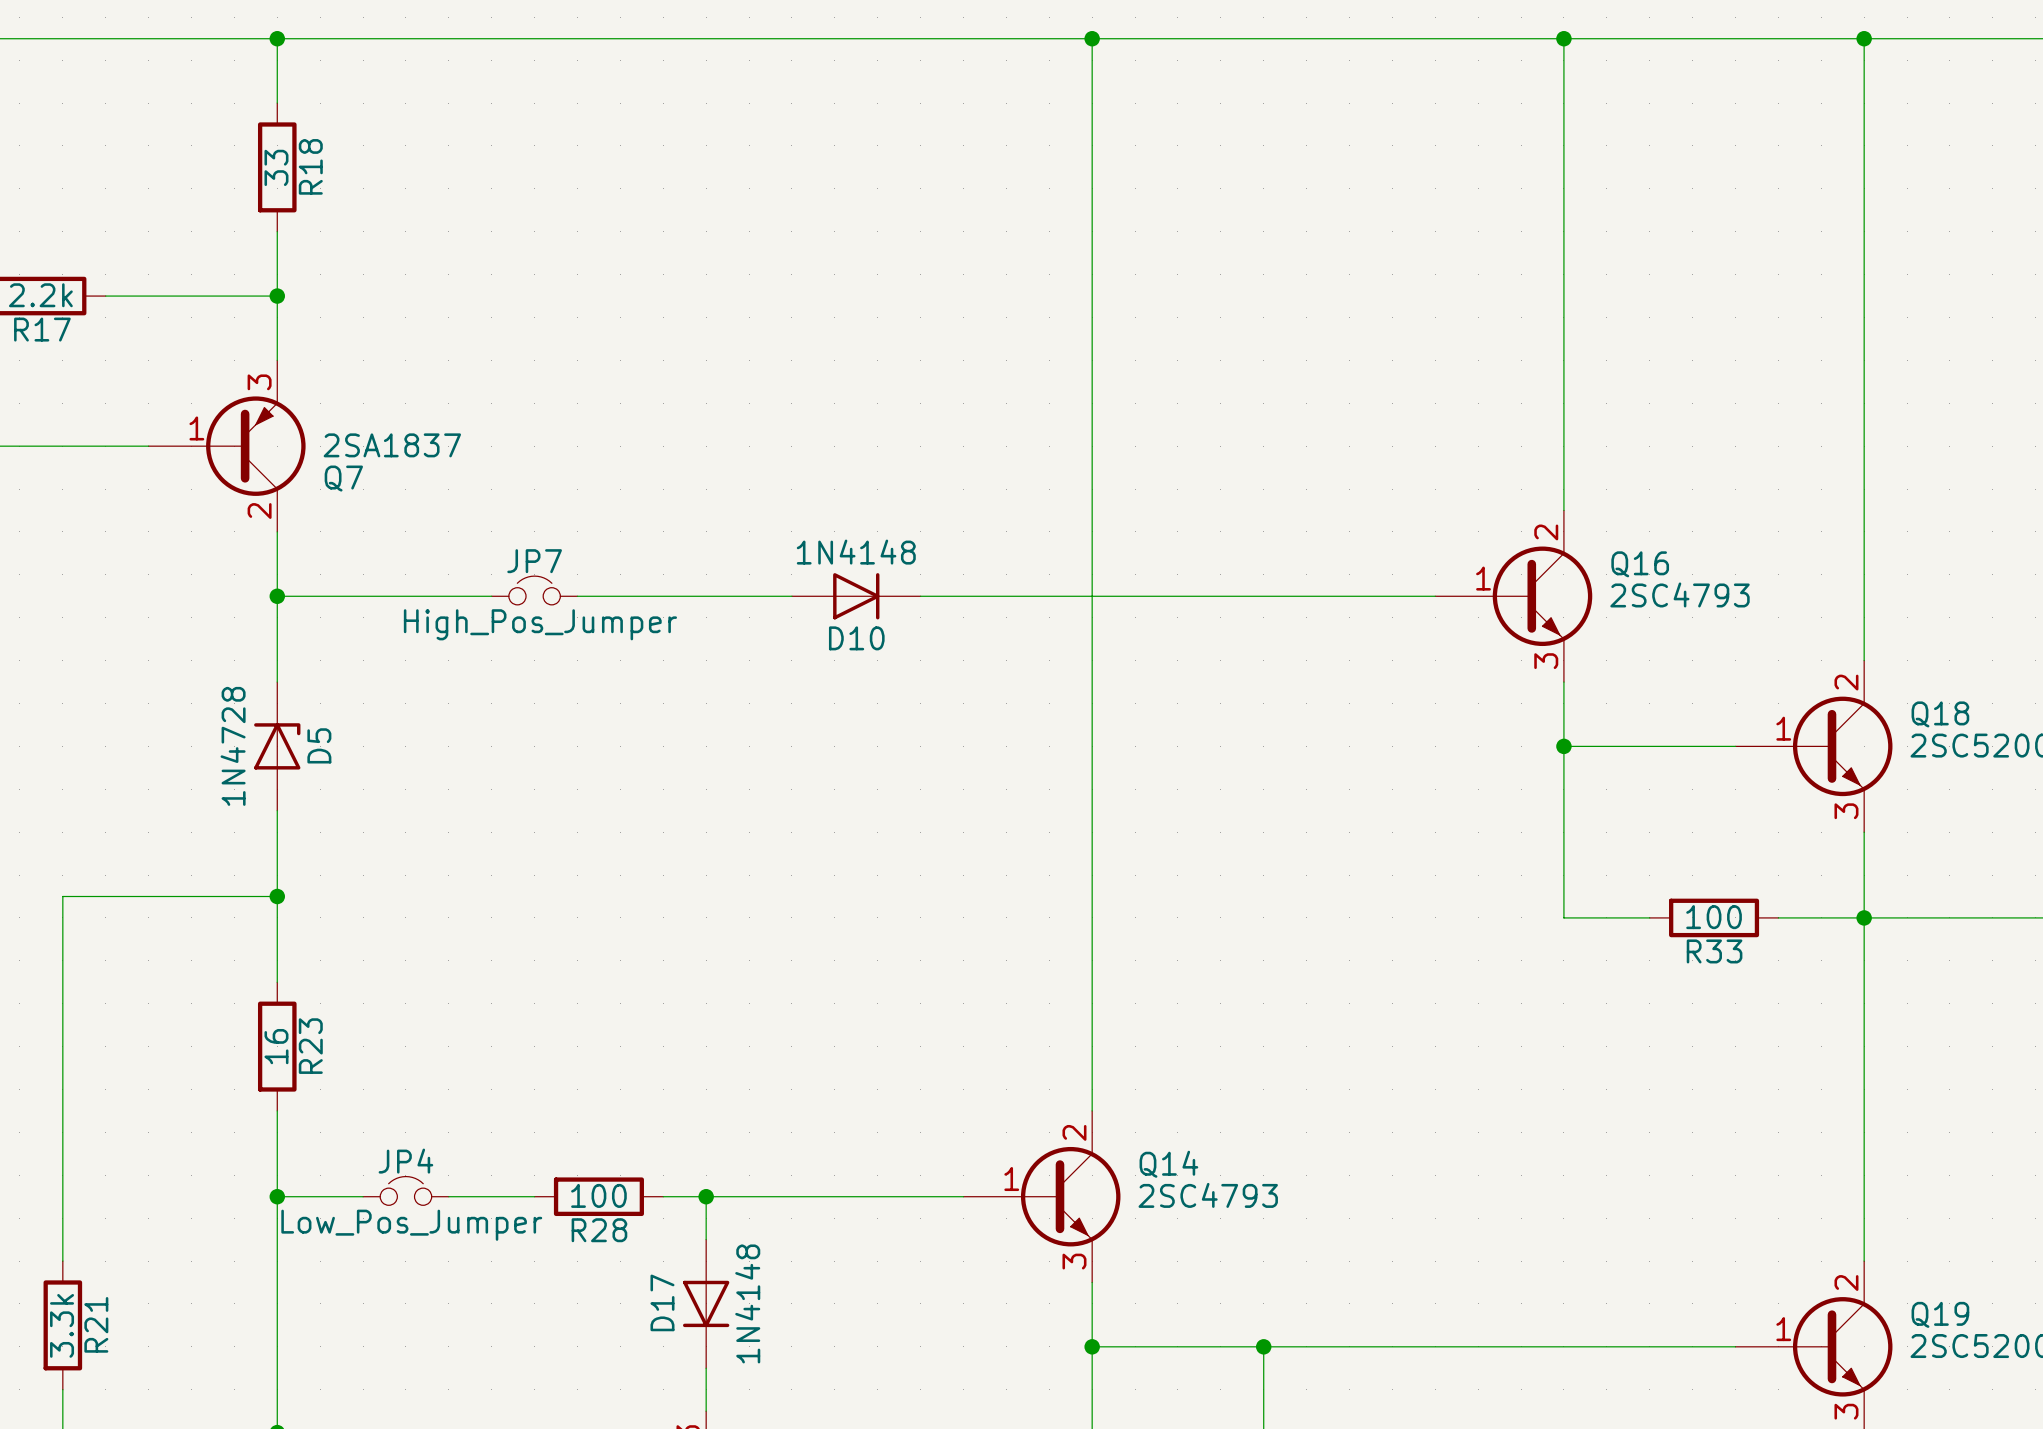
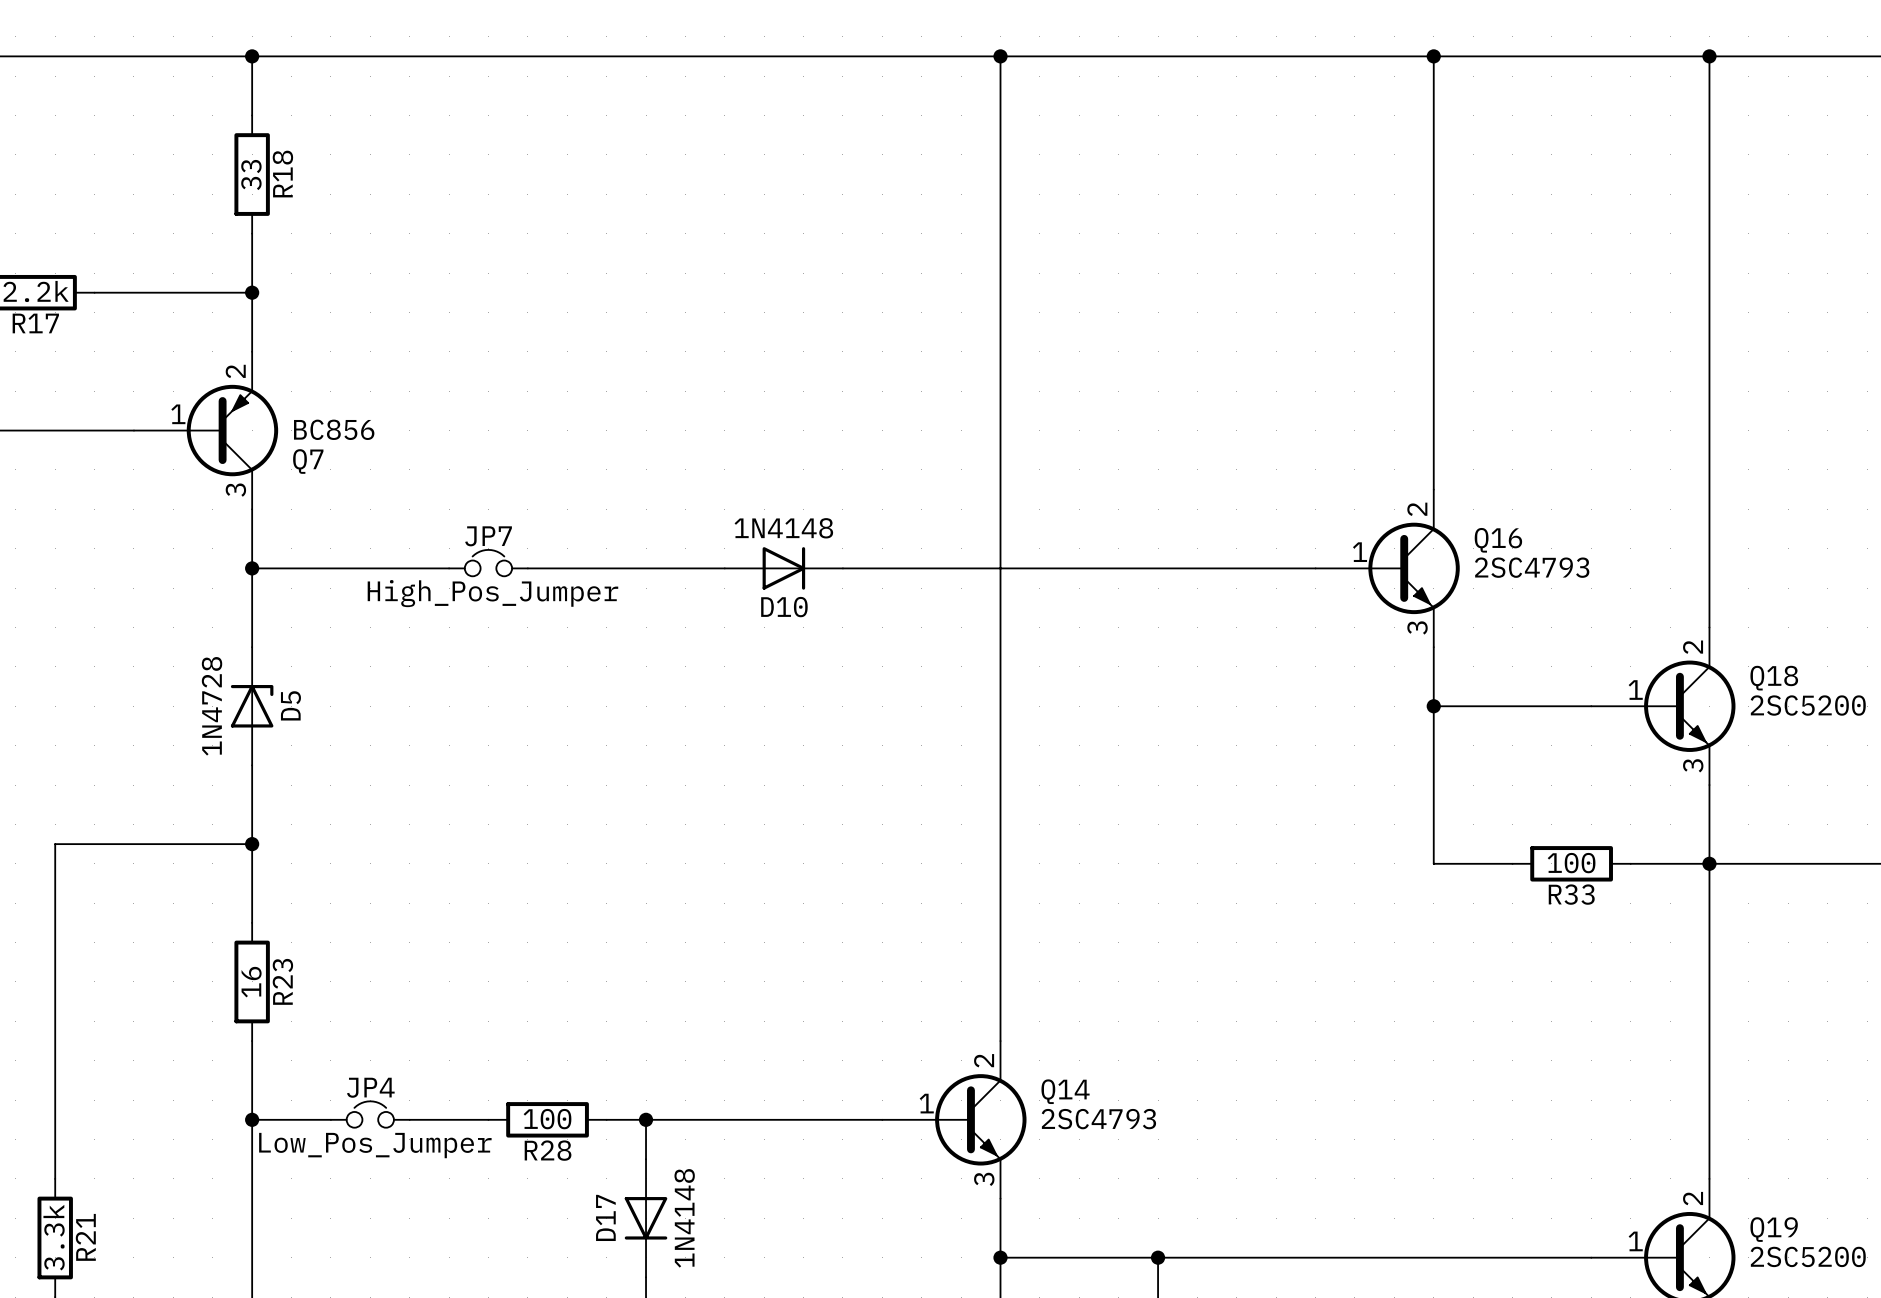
Q7 pin number: 3 (259, 382) -> 2 (235, 371)
Q7 value: 2SA1837 (392, 445) -> BC856 (334, 429)
Q7 pin number: 2 (259, 511) -> 3 (235, 490)

